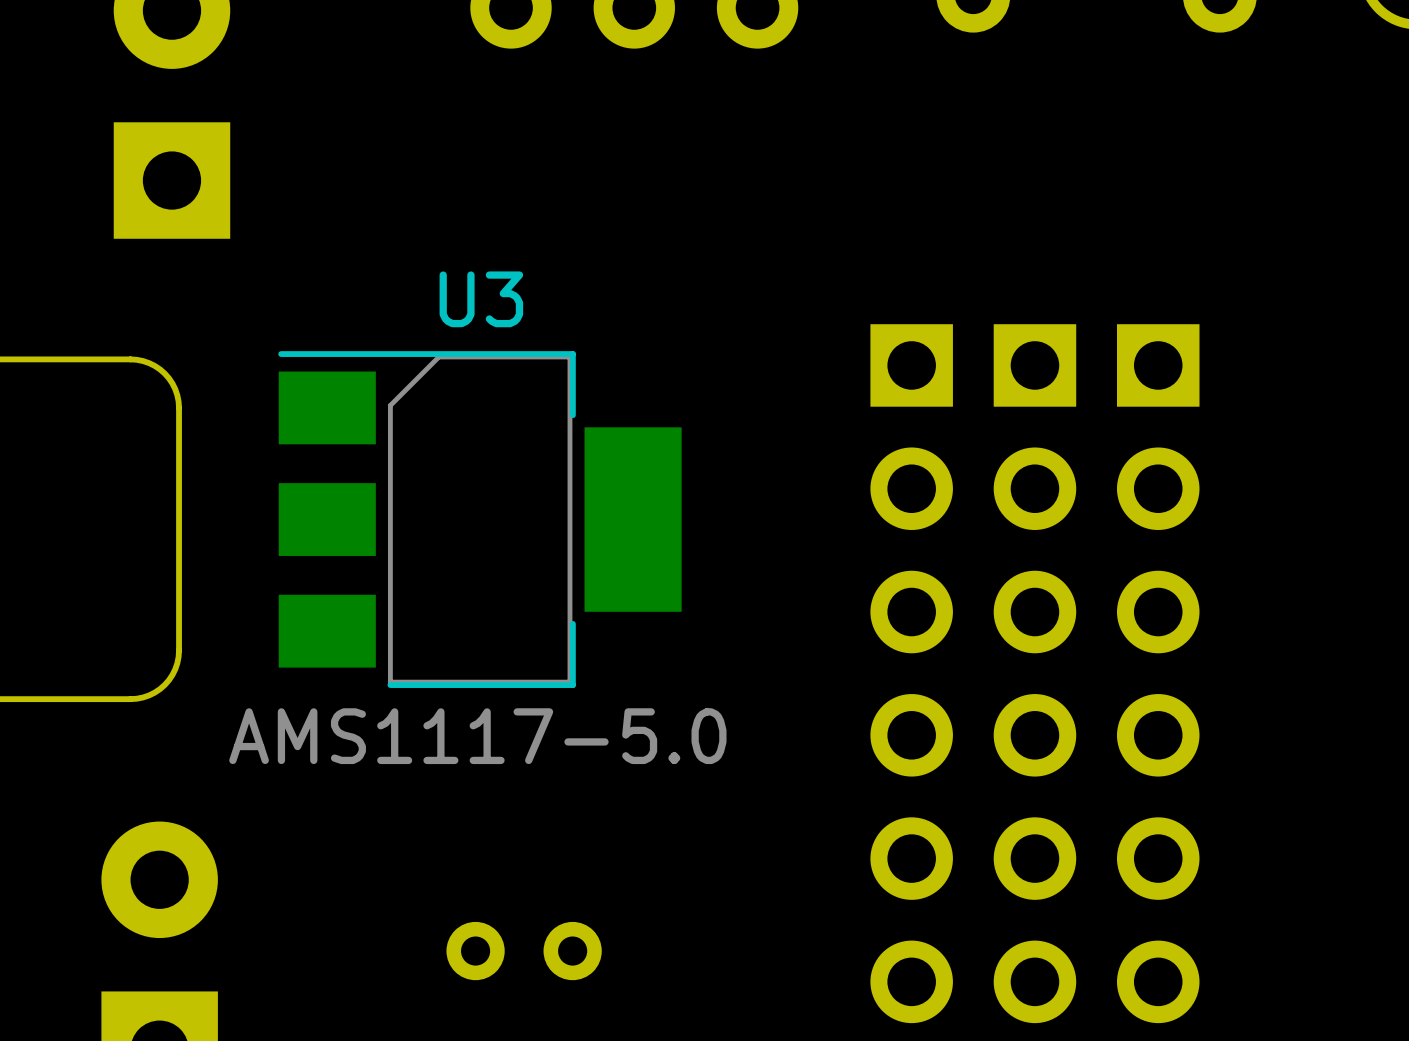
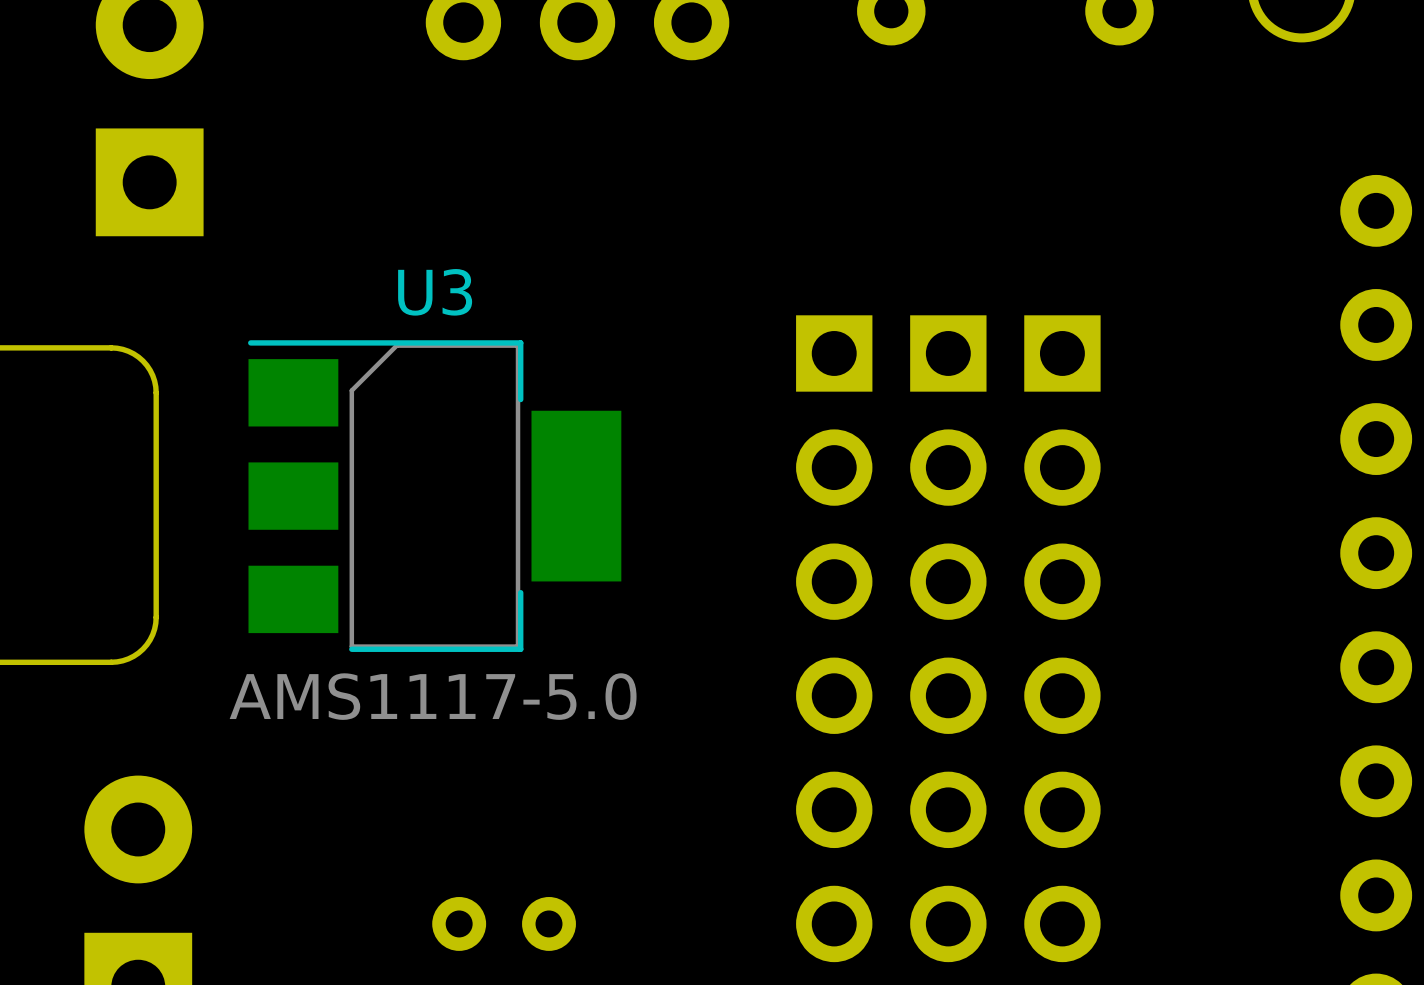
part position: (524, 951) -> (504, 923)

